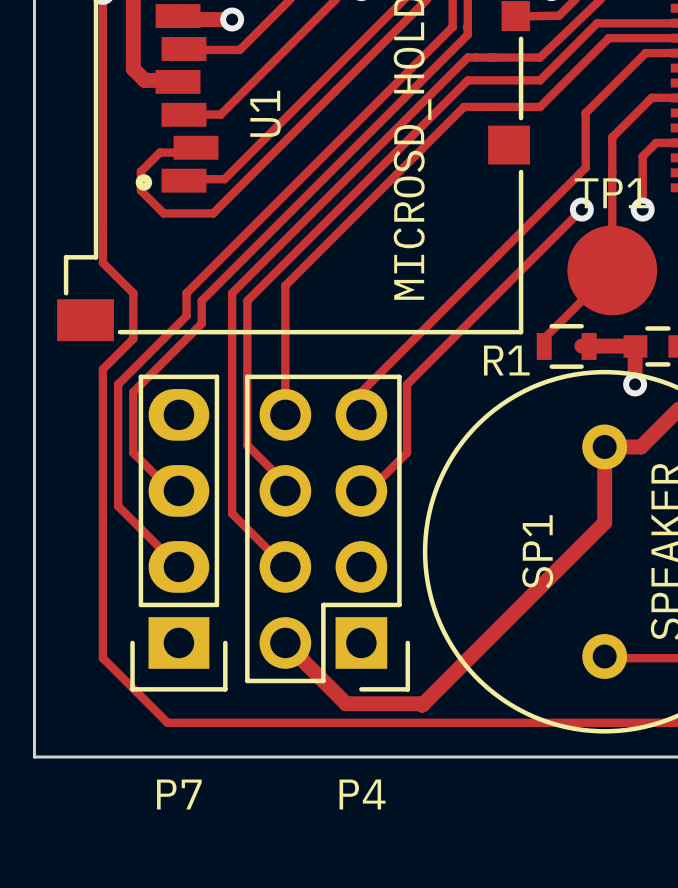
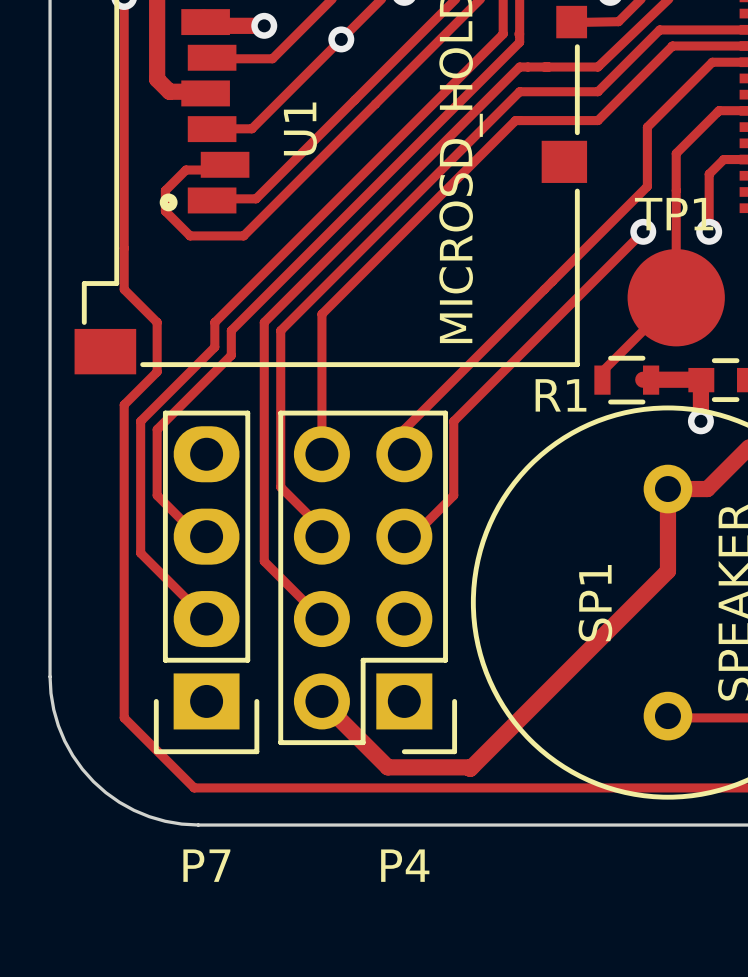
via: none -> (341, 39)
board edge: (34, 620) (34, 757) (171, 757) -> (50, 676) (50, 693) (58, 725) (72, 755) (93, 781) (105, 792) (134, 810) (165, 821) (198, 825)

